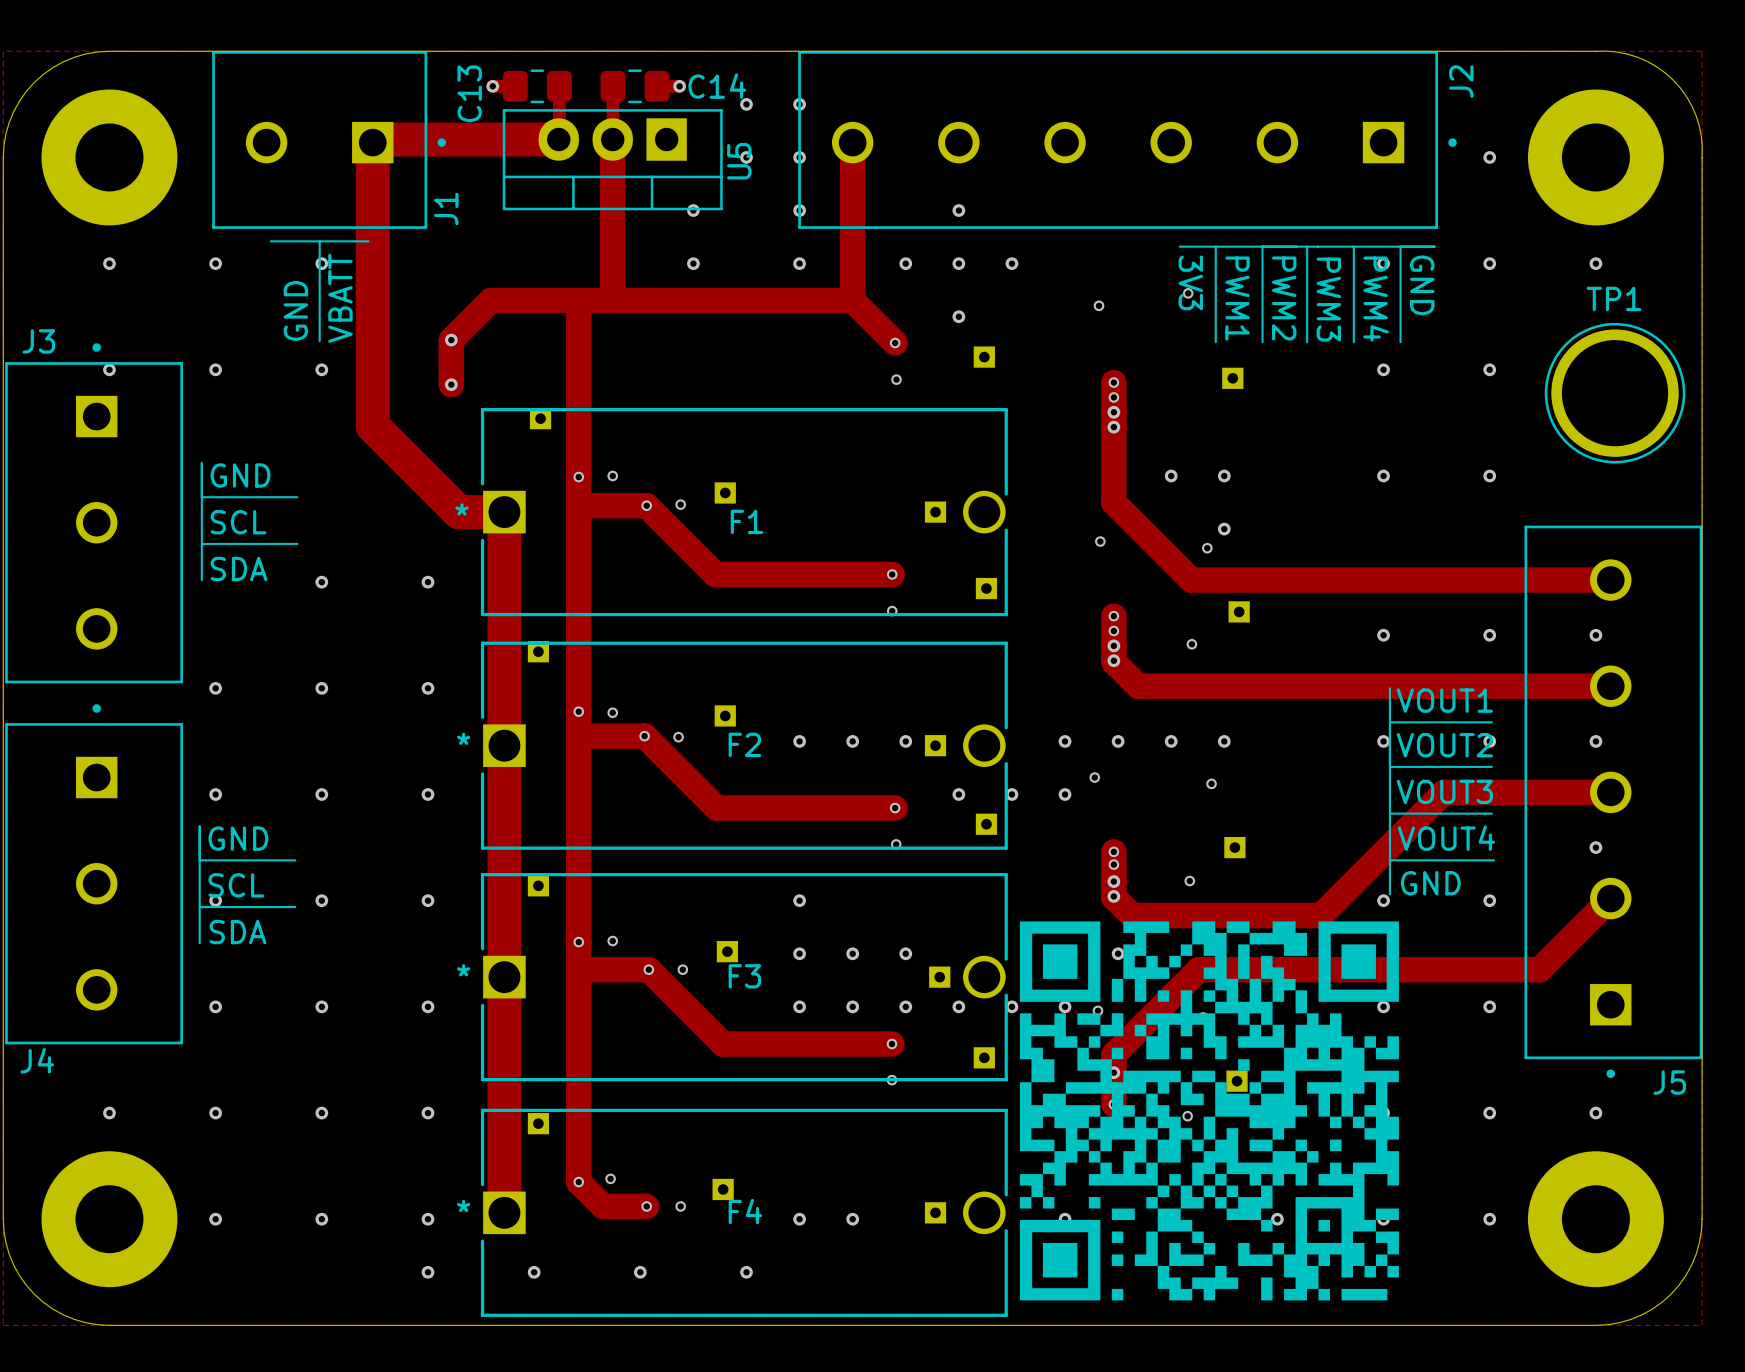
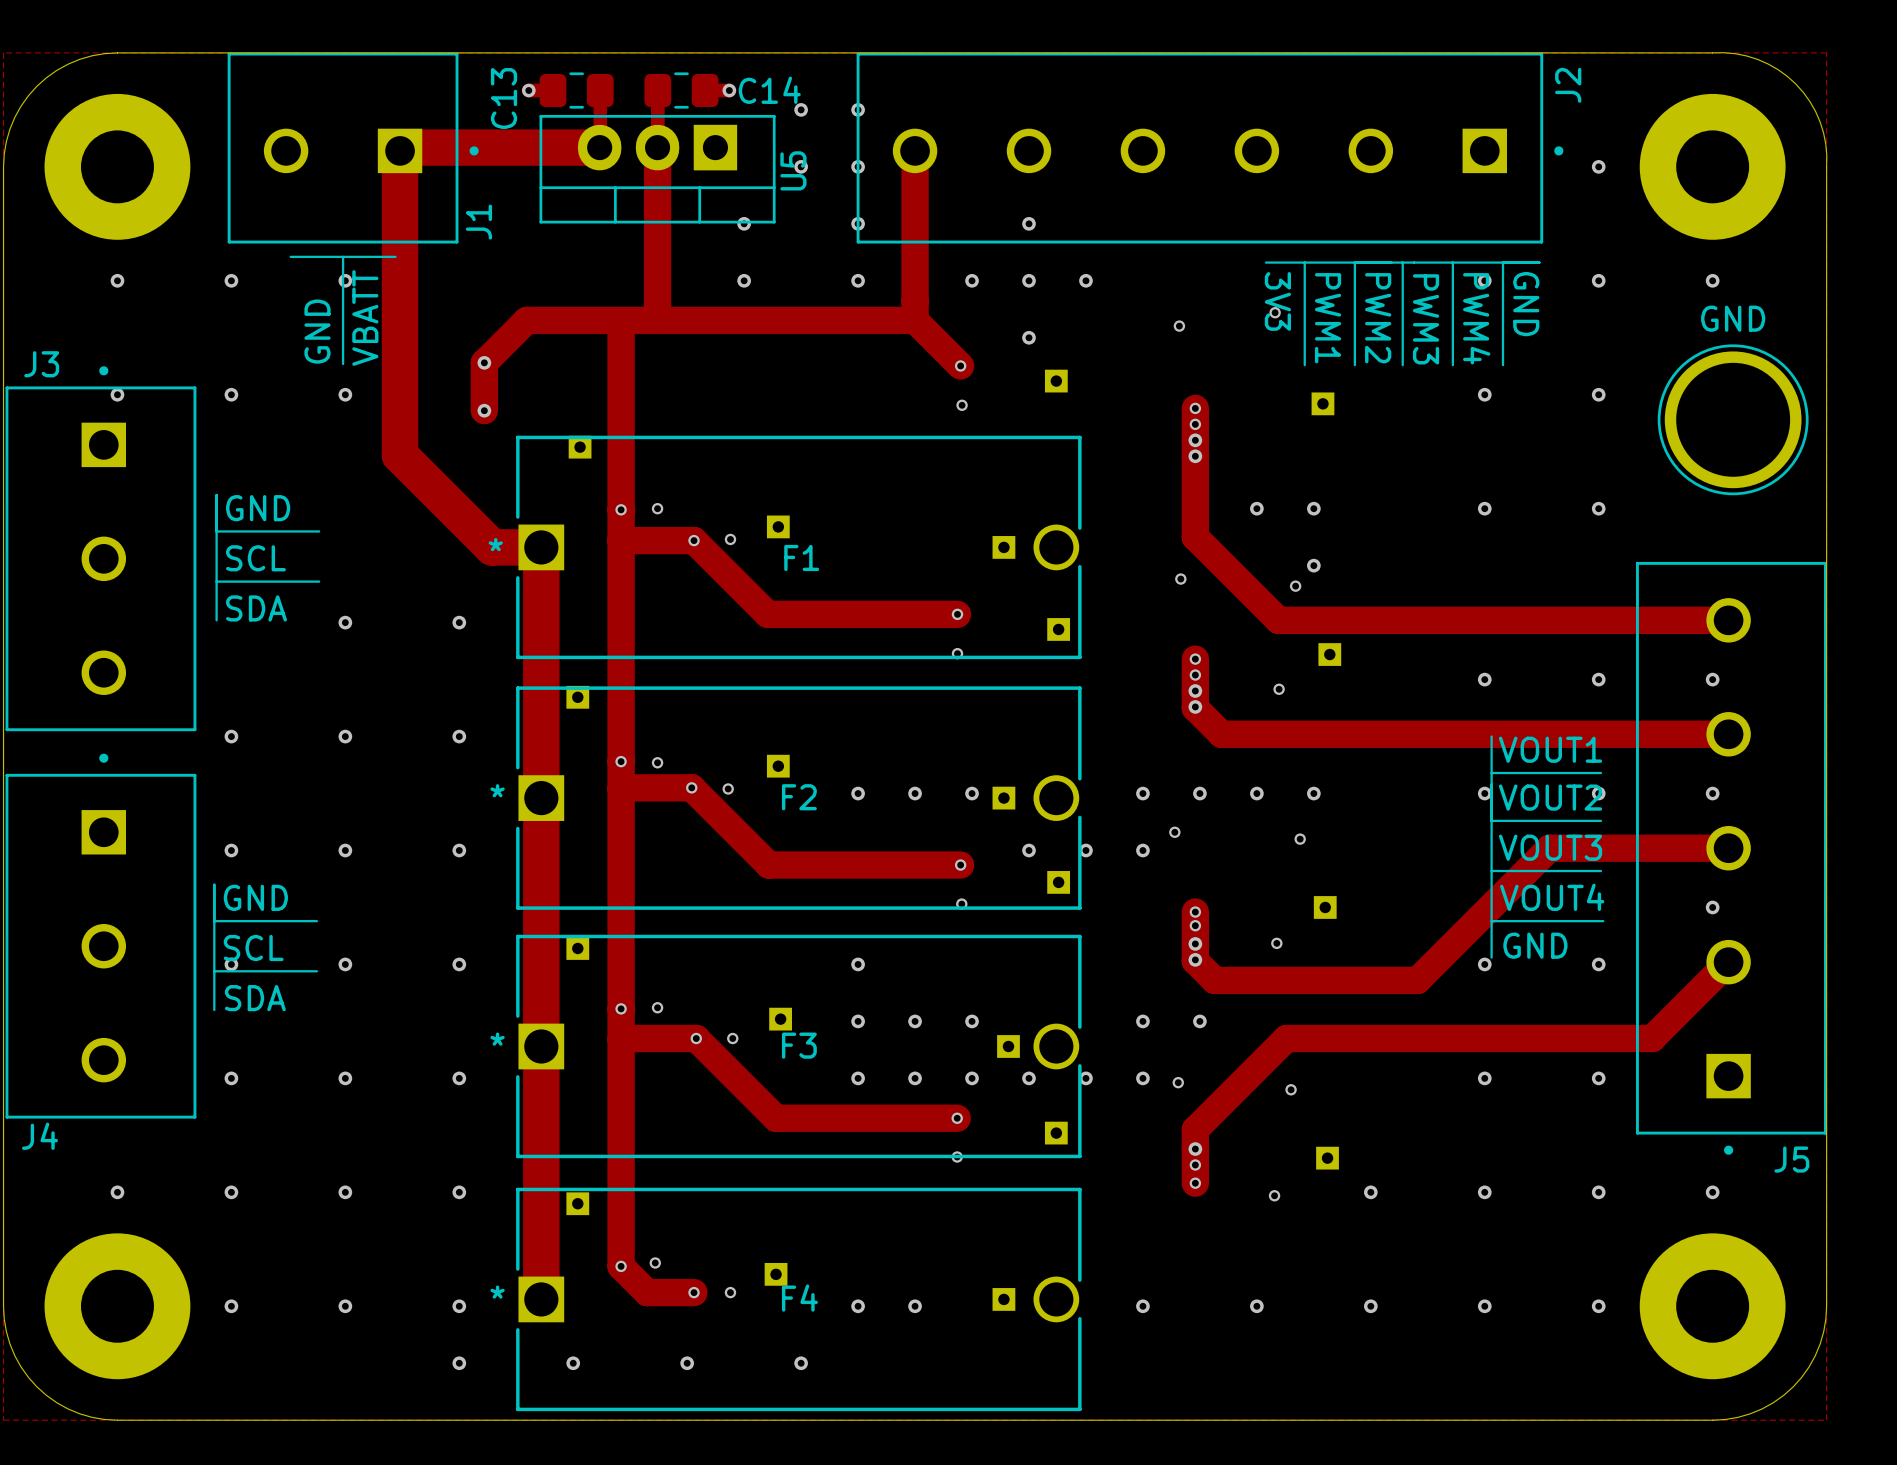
TP1 name: TP1 (1614, 298) -> GND (1733, 318)
drawing: [1019, 921, 1399, 1301] -> none

